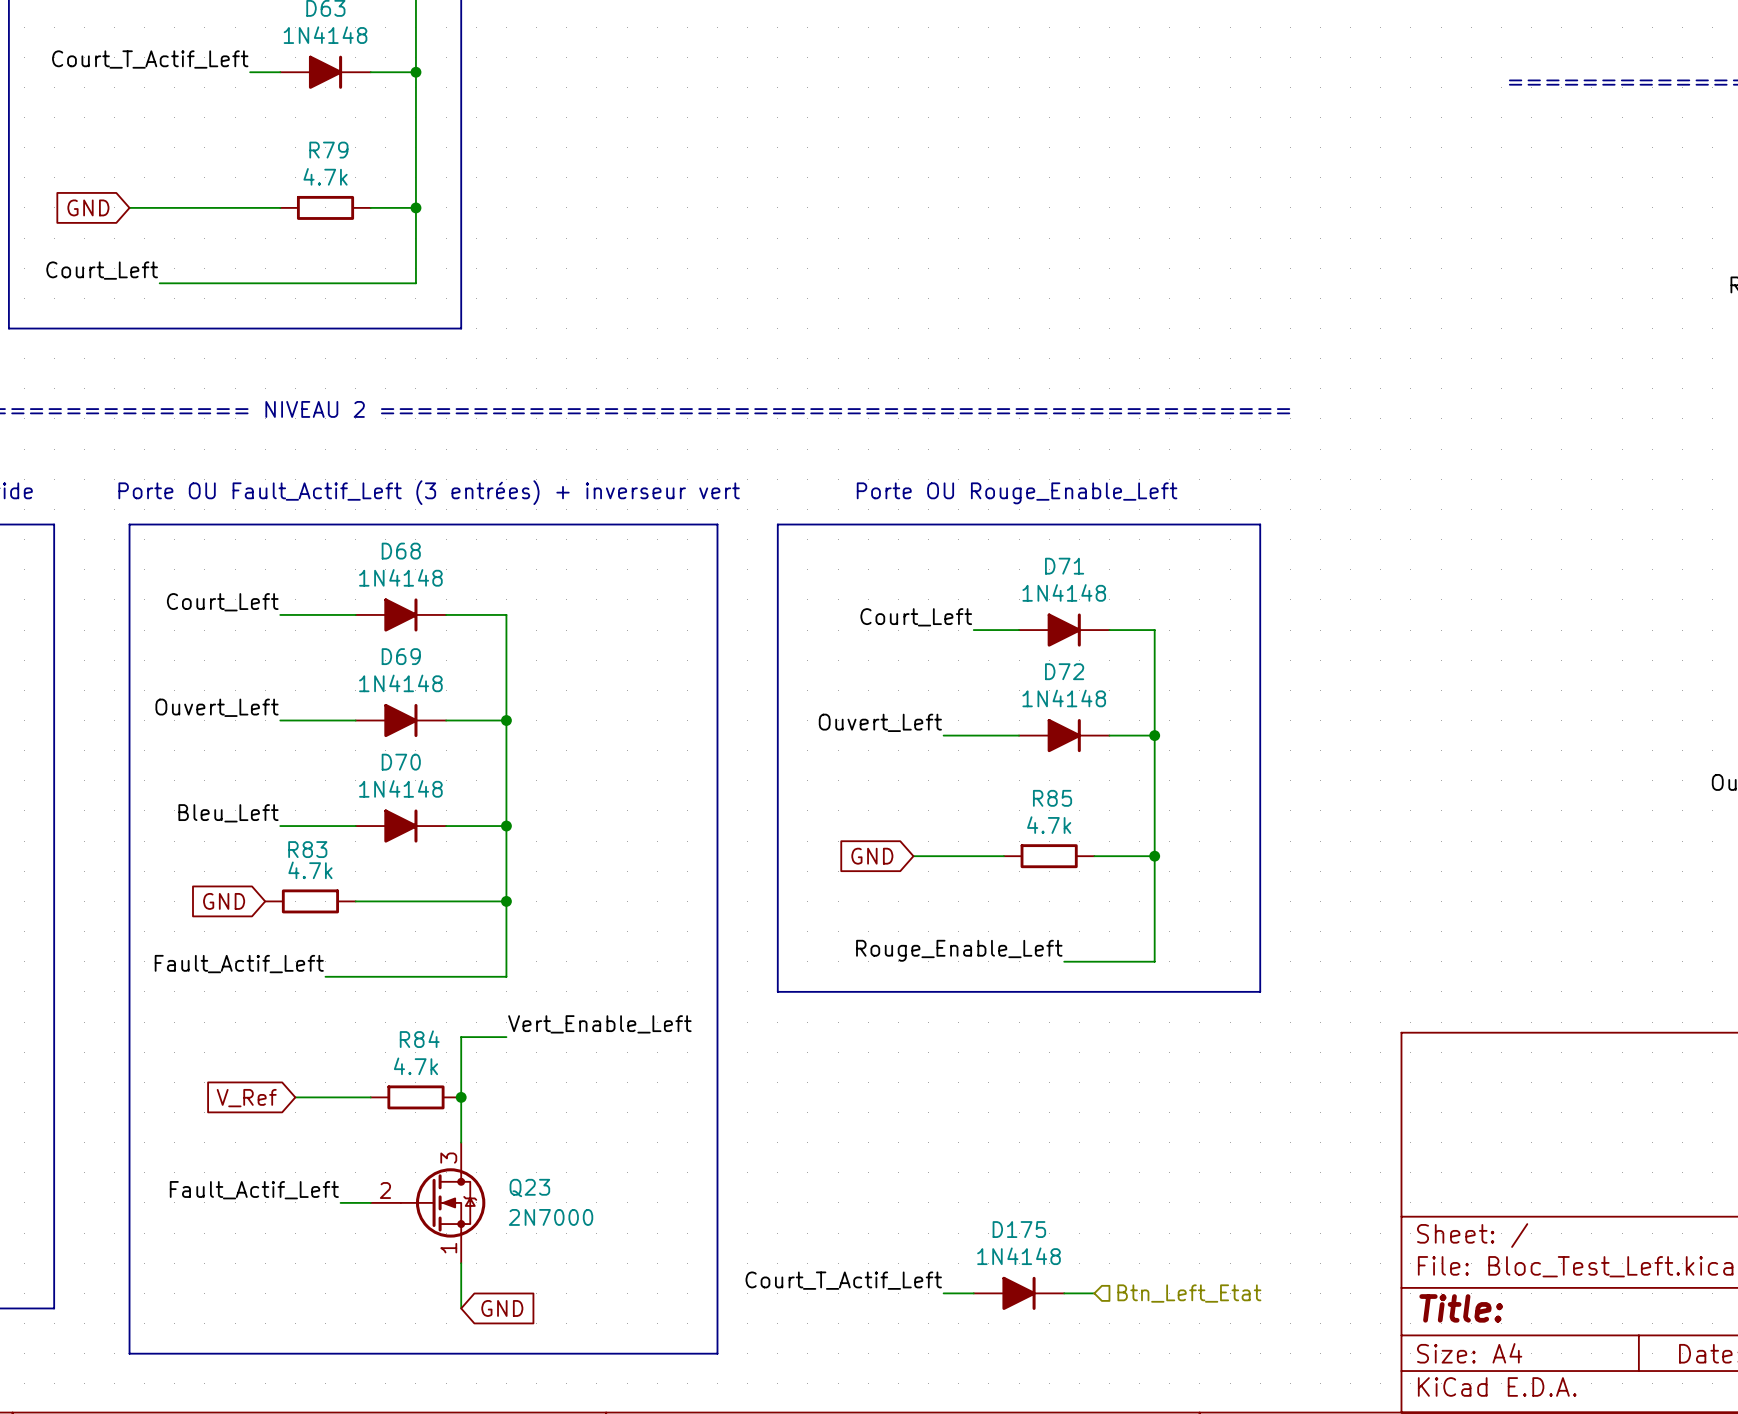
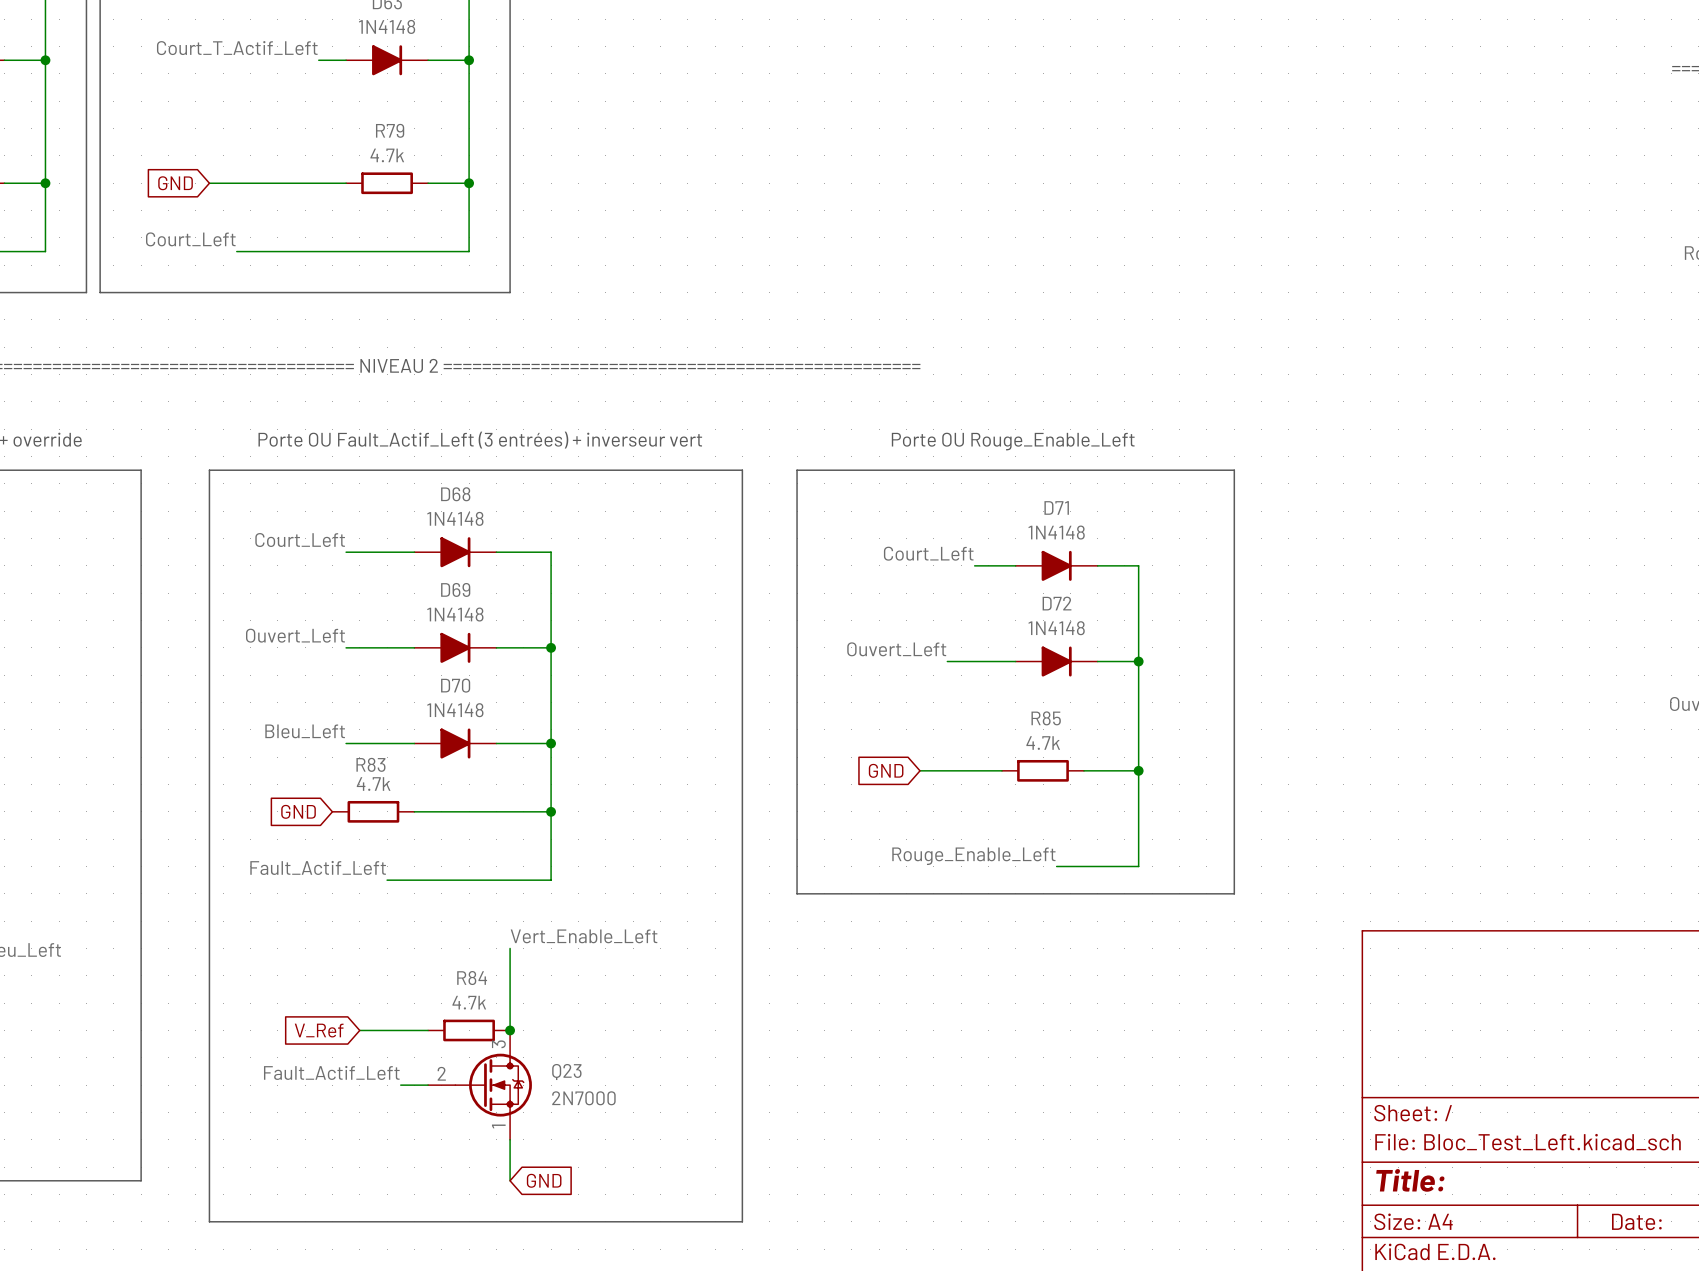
label position: Vert_Enable_Left (599, 1024) -> Vert_Enable_Left (584, 936)
wire: (506, 1037) (461, 1037) (461, 1052) -> none
wire: (295, 1097) (370, 1097) -> (359, 1030) (428, 1030)
R84 position: (415, 1097) -> (469, 1030)
junction position: (461, 1097) -> (510, 1030)
global label position: V_Ref (246, 1098) -> V_Ref (319, 1030)
label: Court_T_Actif_Left (843, 1280) -> none
wire: (943, 1293) (973, 1293) -> none
D175: 1N4148 (1019, 1293) -> none
wire: (1064, 1293) (1094, 1293) -> none
hierarchical label: Btn_Left_Etat (1189, 1293) -> none

